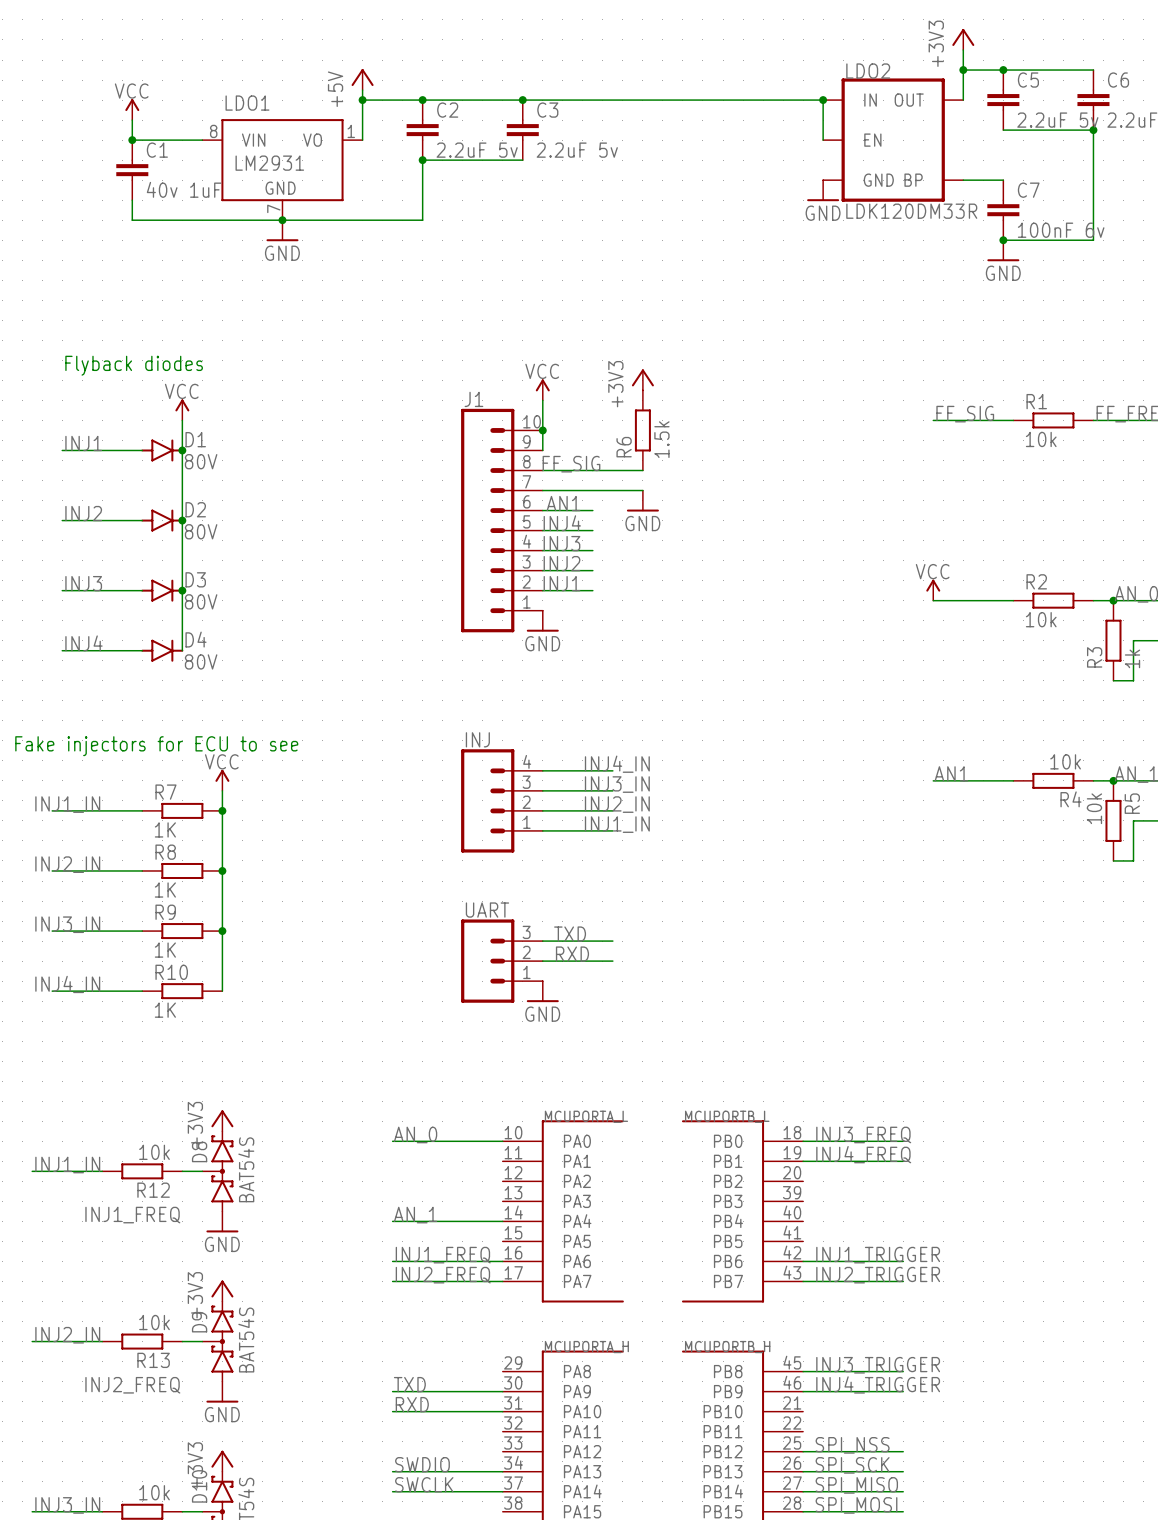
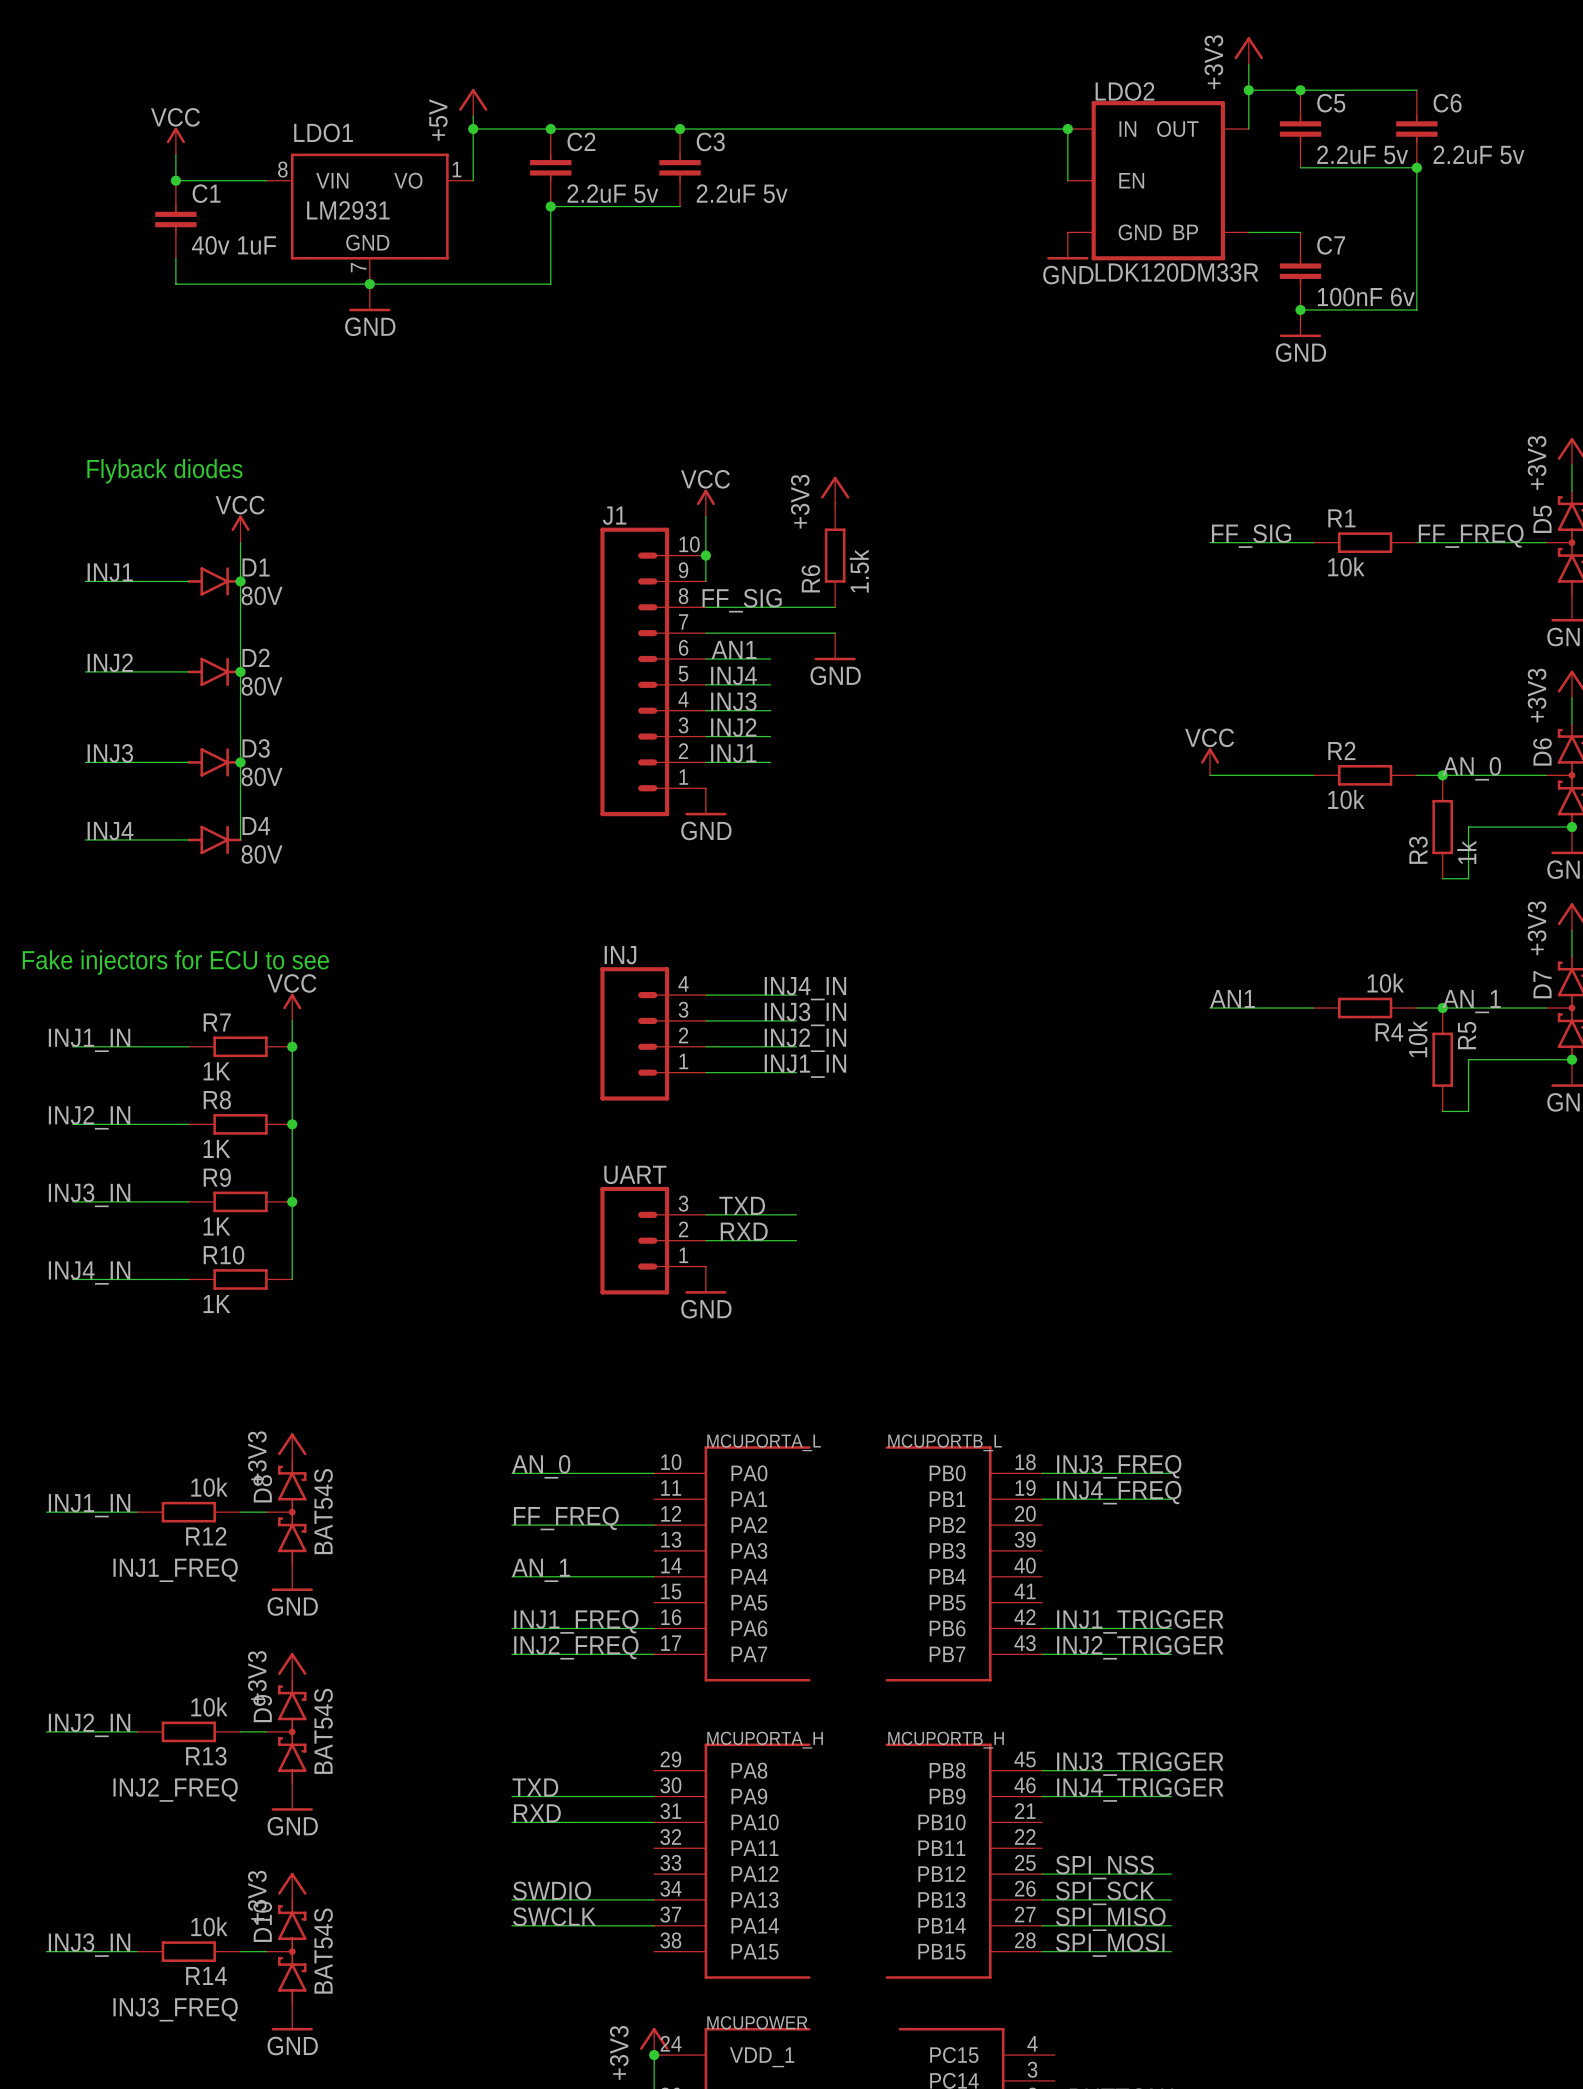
label: none -> FF_FREQ (566, 1518)
wire: none -> (511, 1525) (654, 1525)

